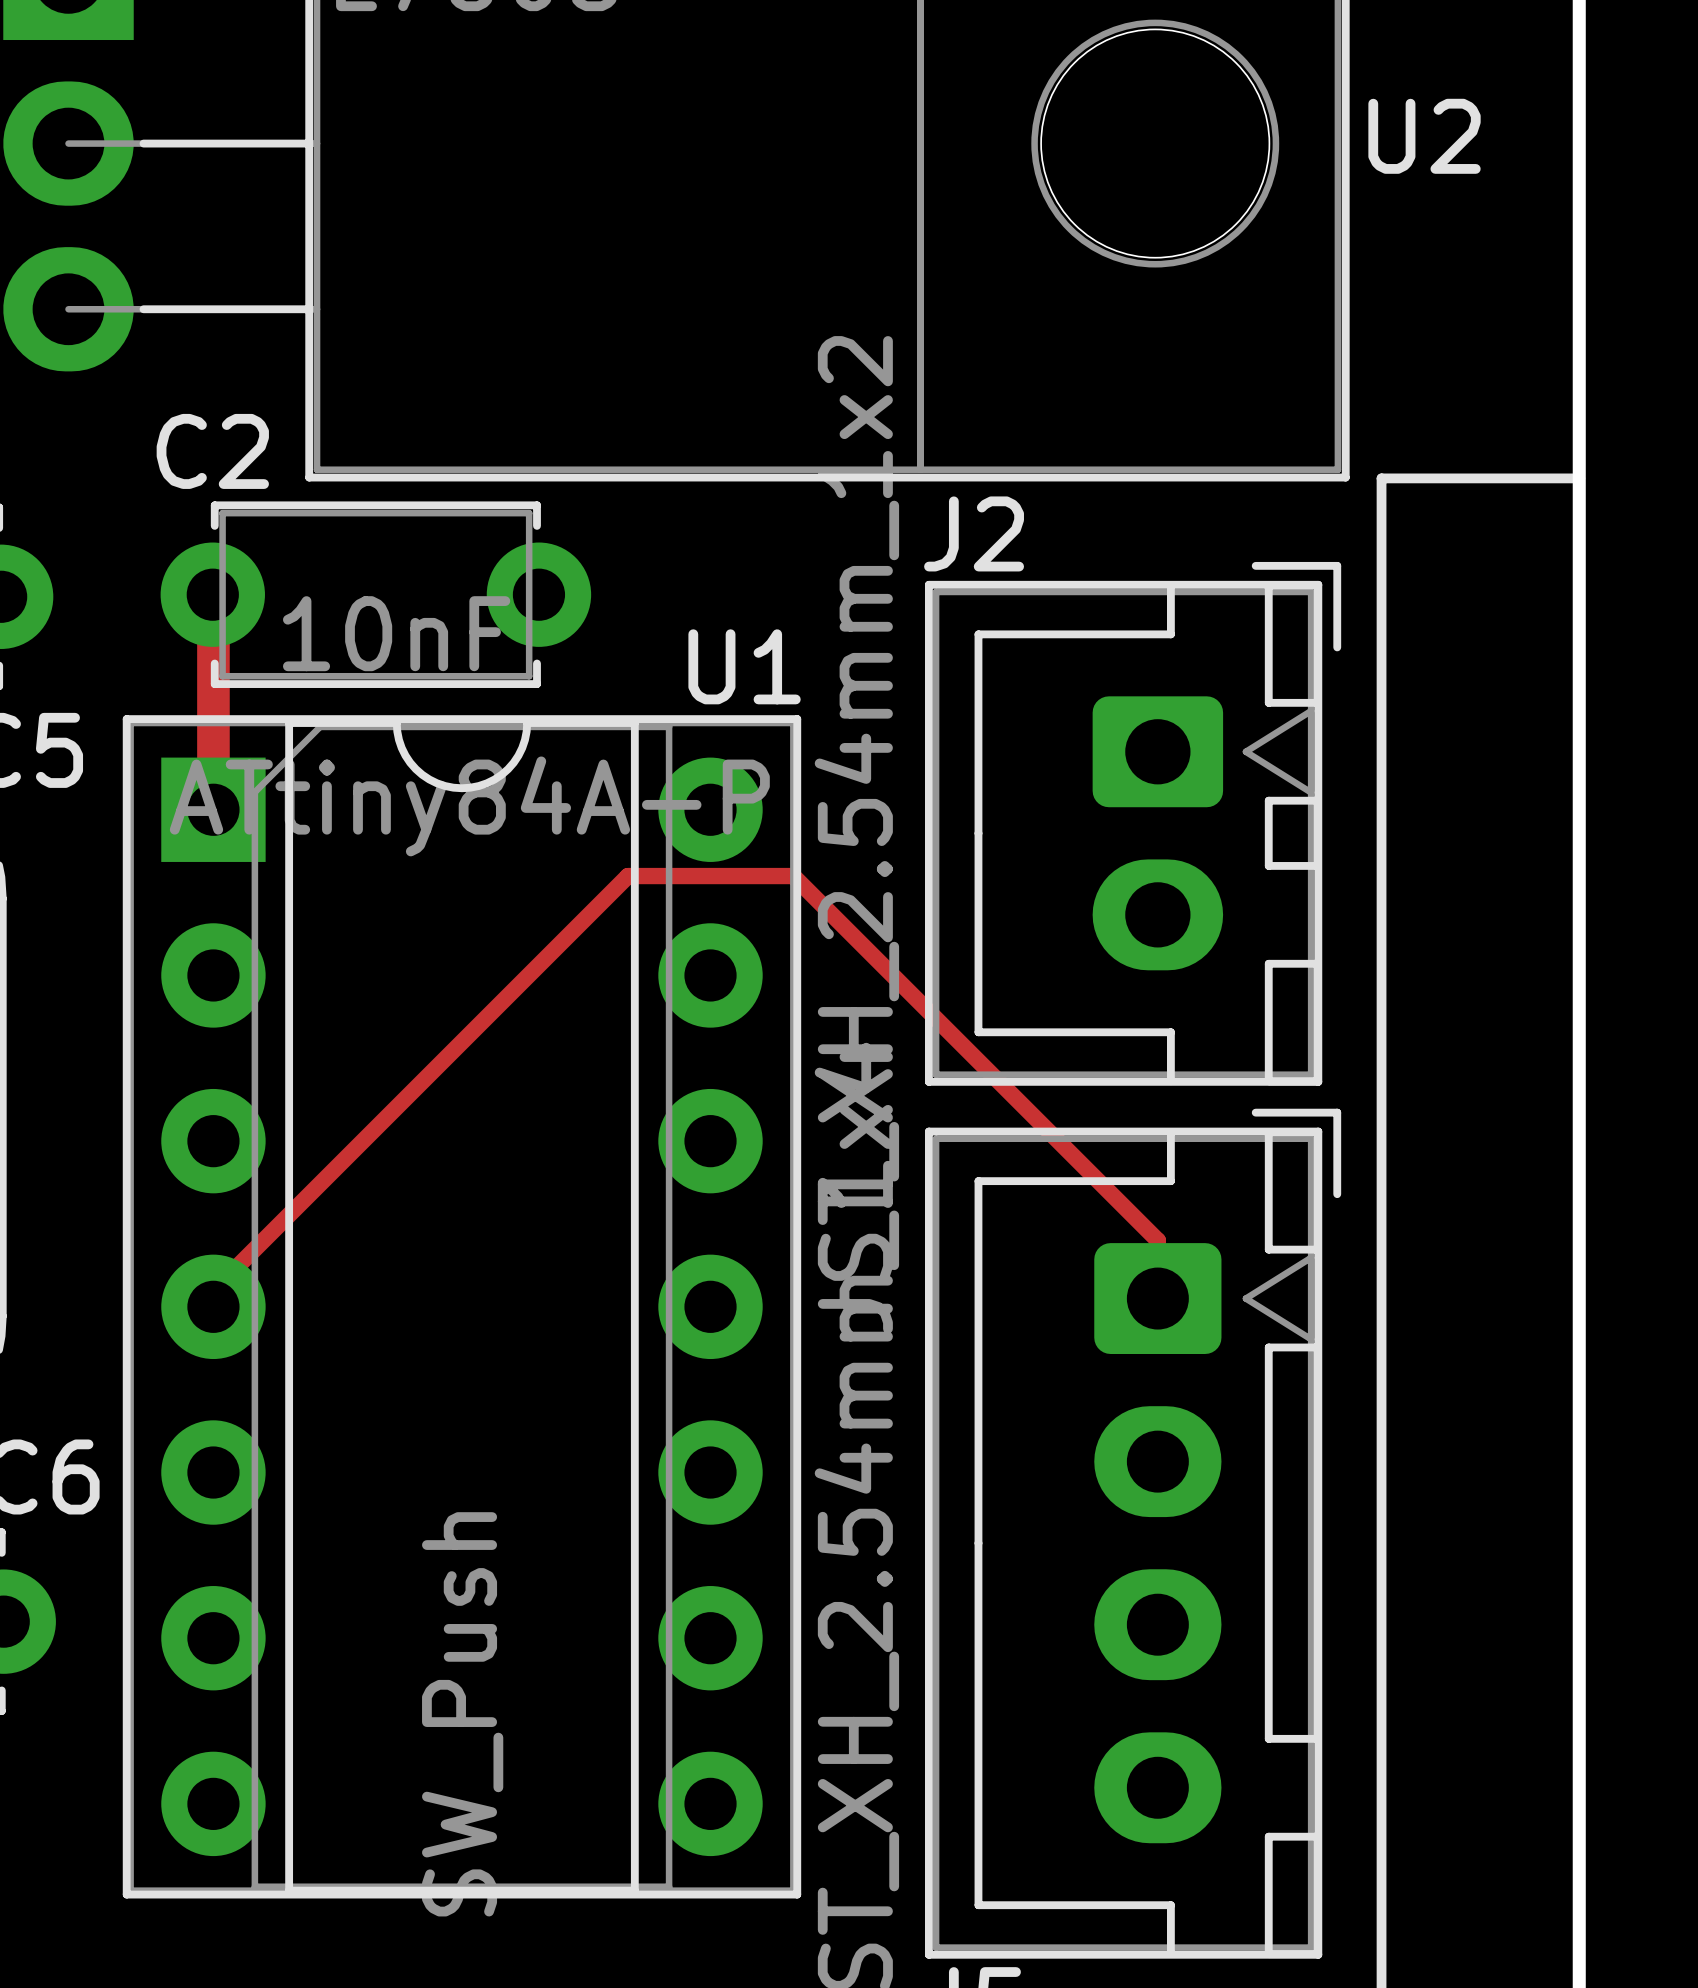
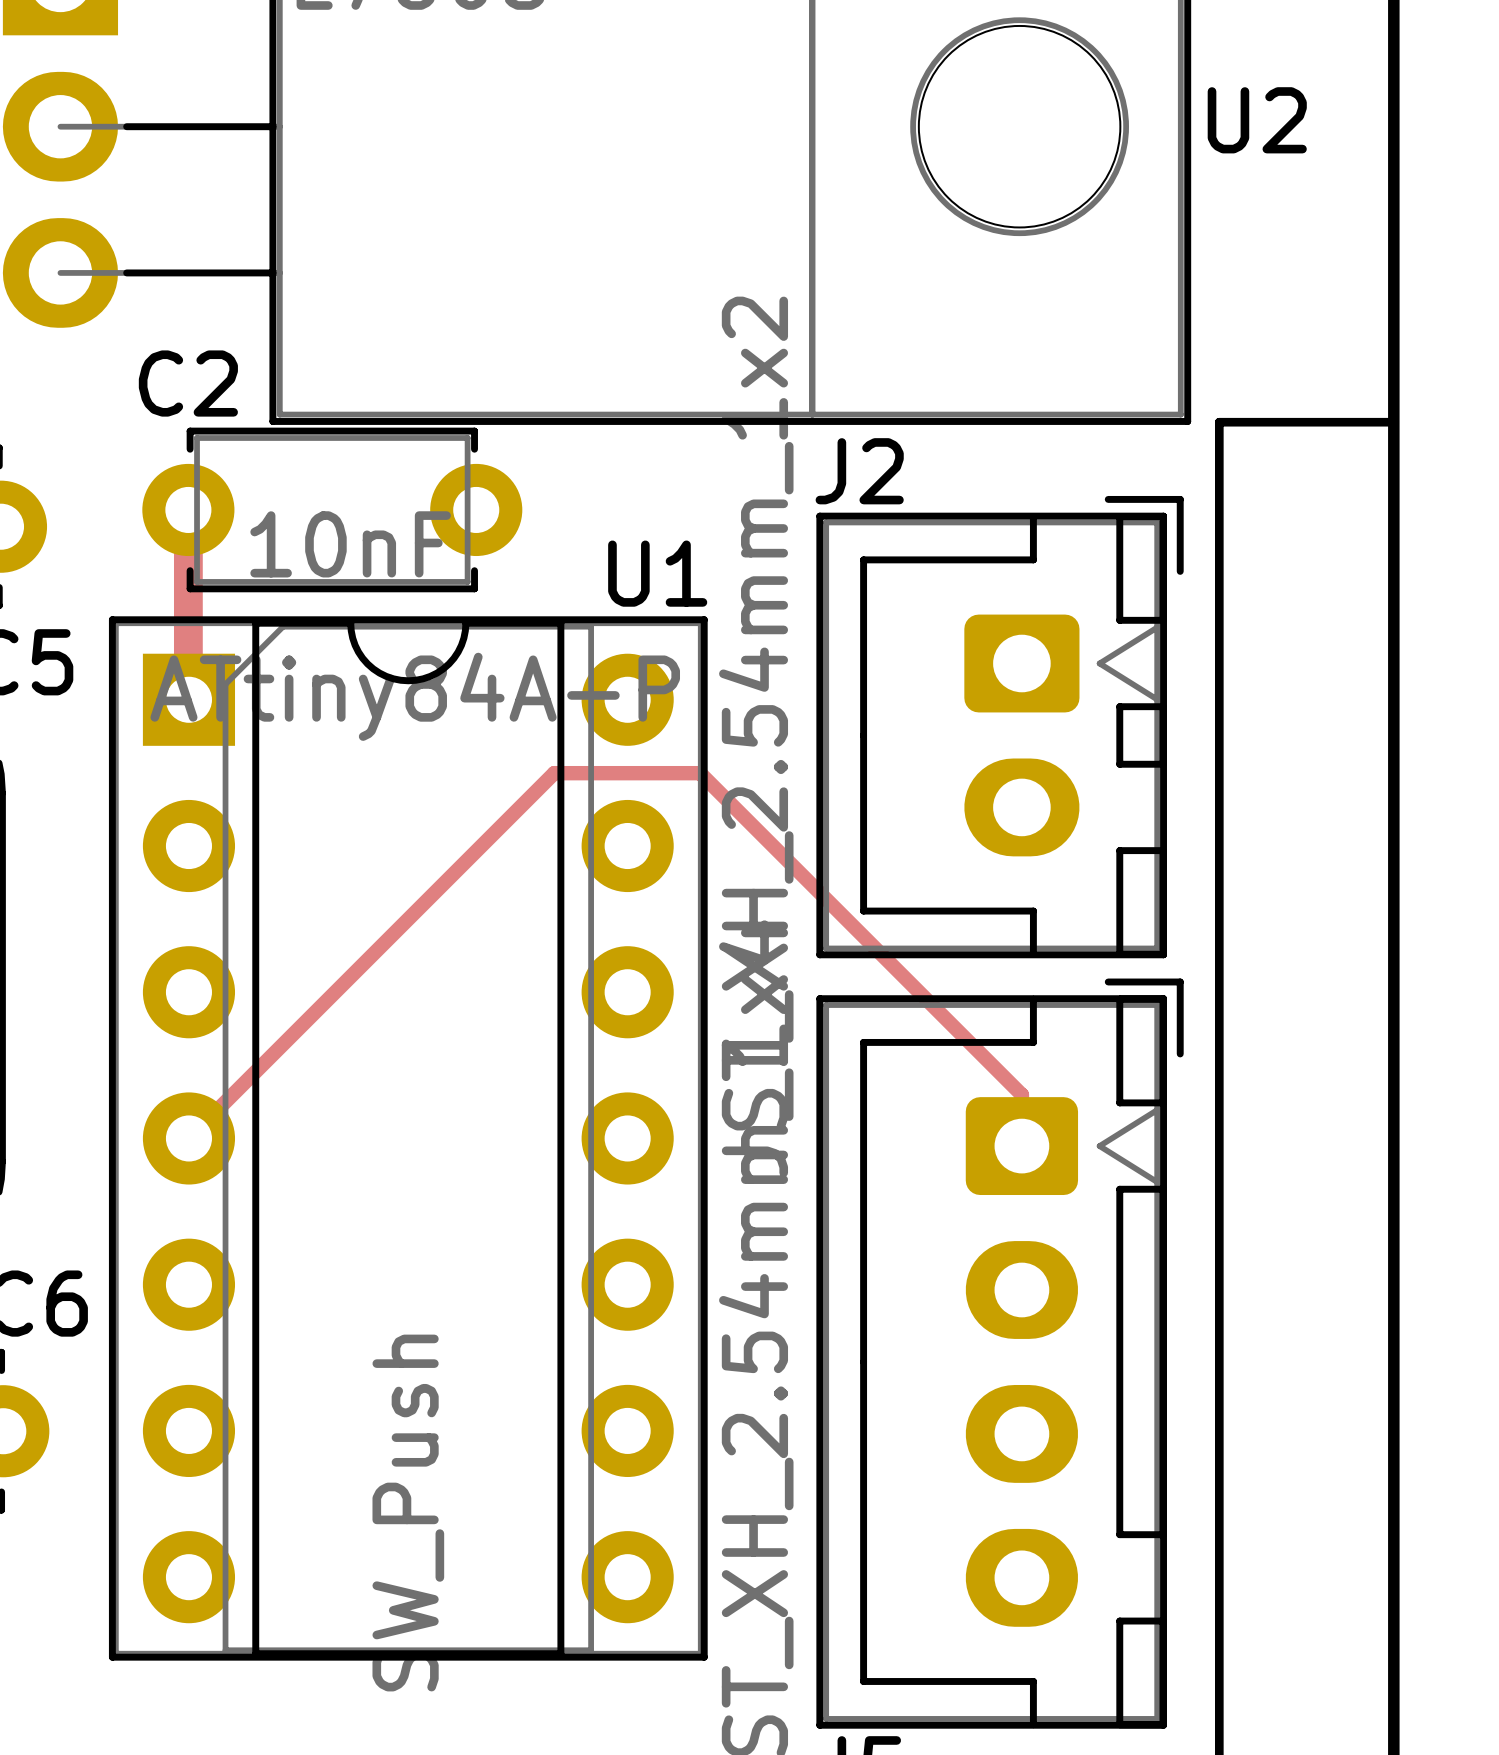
C2 position: (375, 594) -> (332, 509)
U1 position: (461, 1306) -> (408, 1138)

